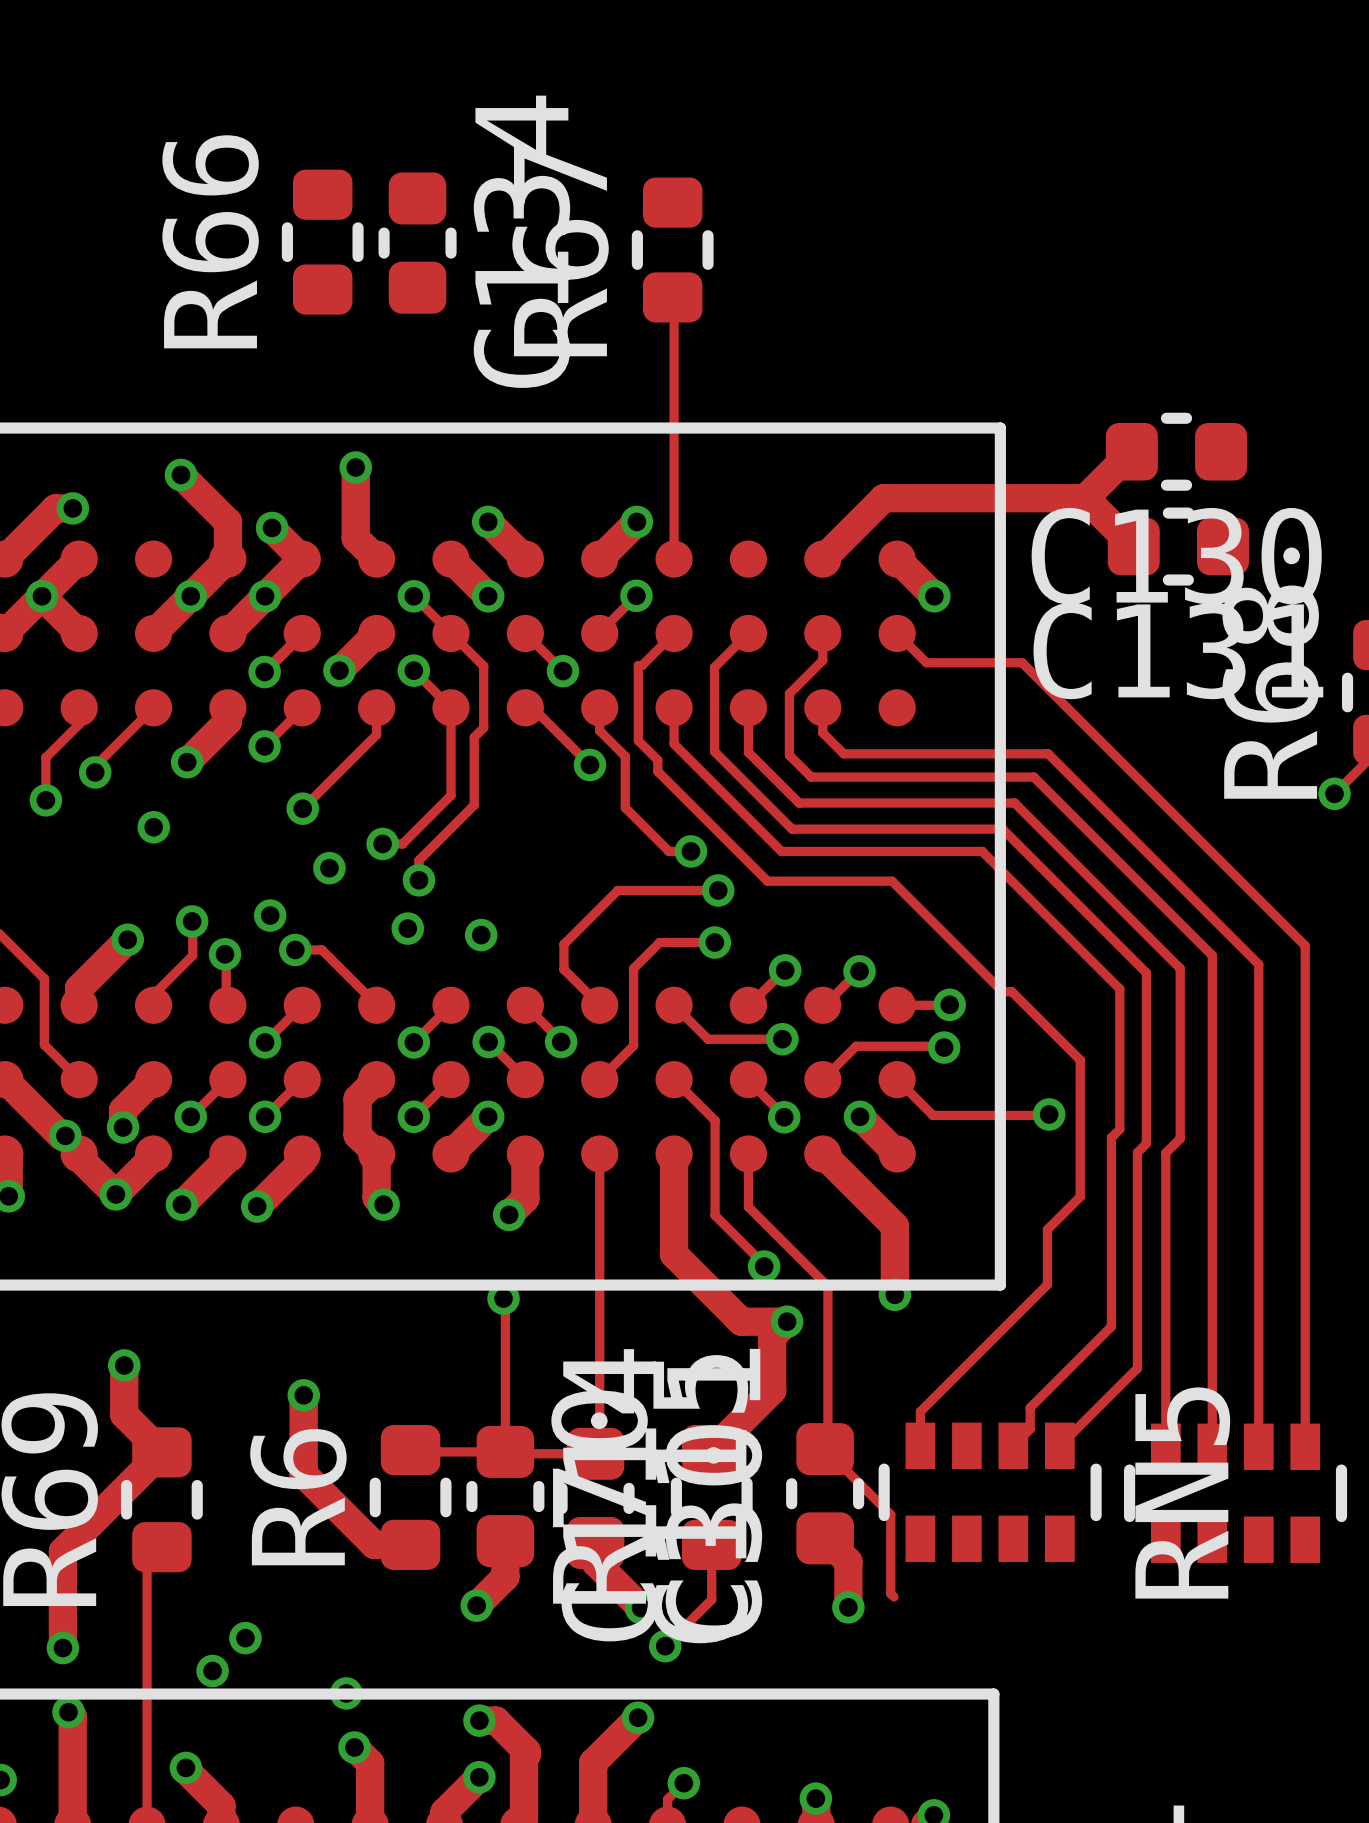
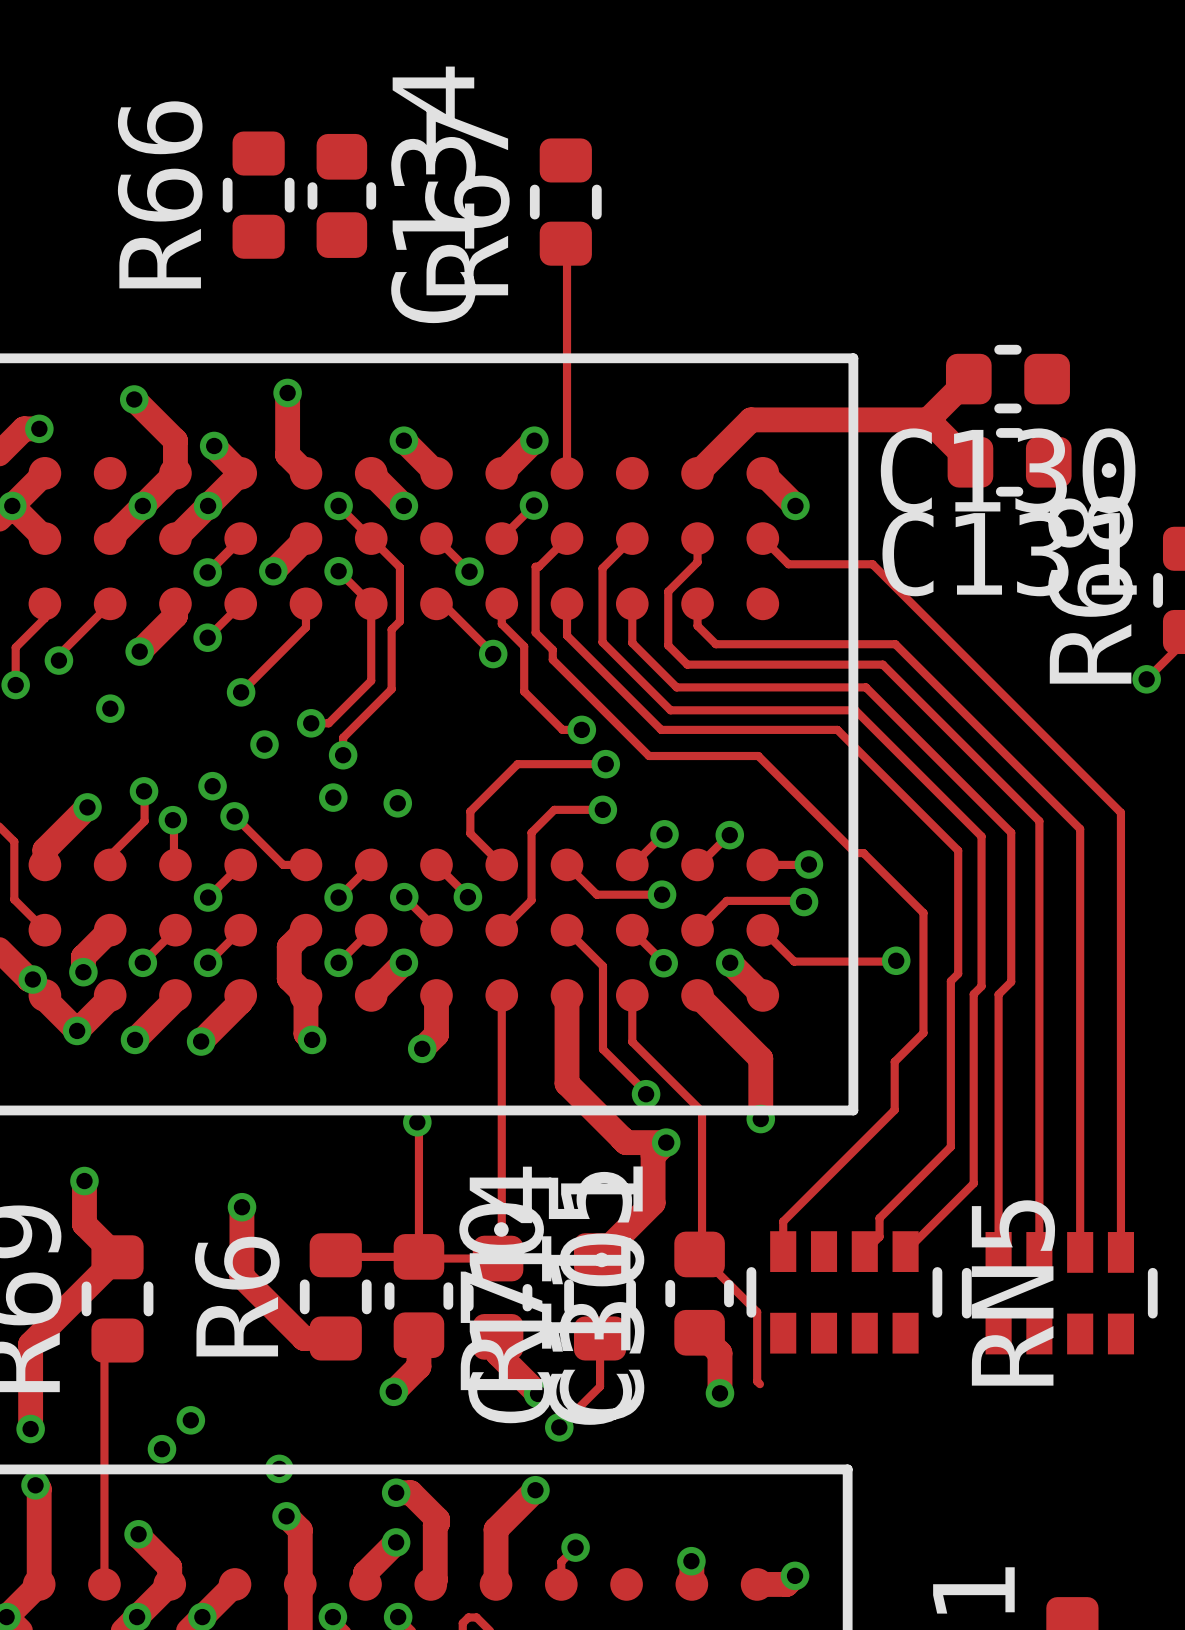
track: (295, 949) (321, 949) (376, 1004) -> (234, 816) (283, 864) (305, 864)

